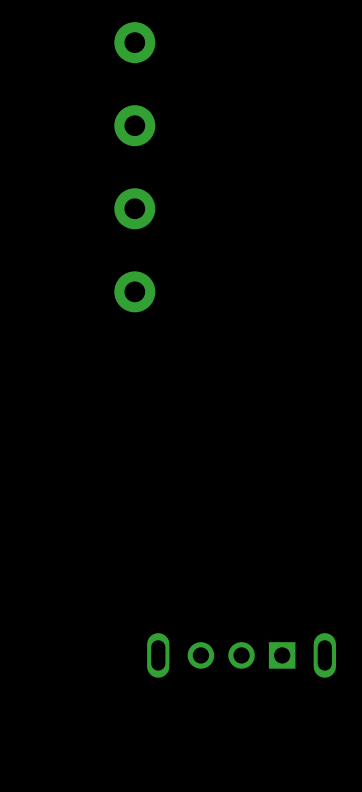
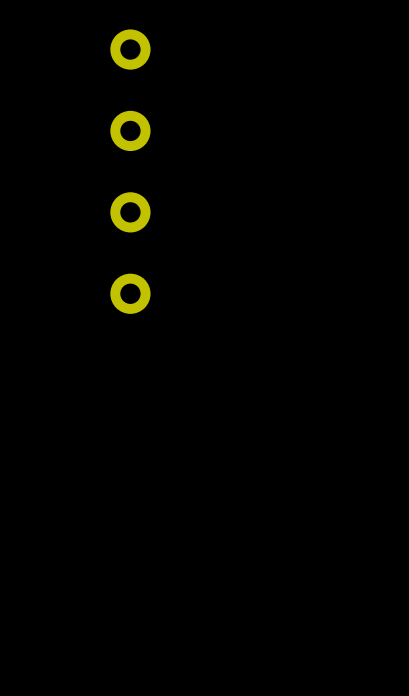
part: (241, 655) -> none

